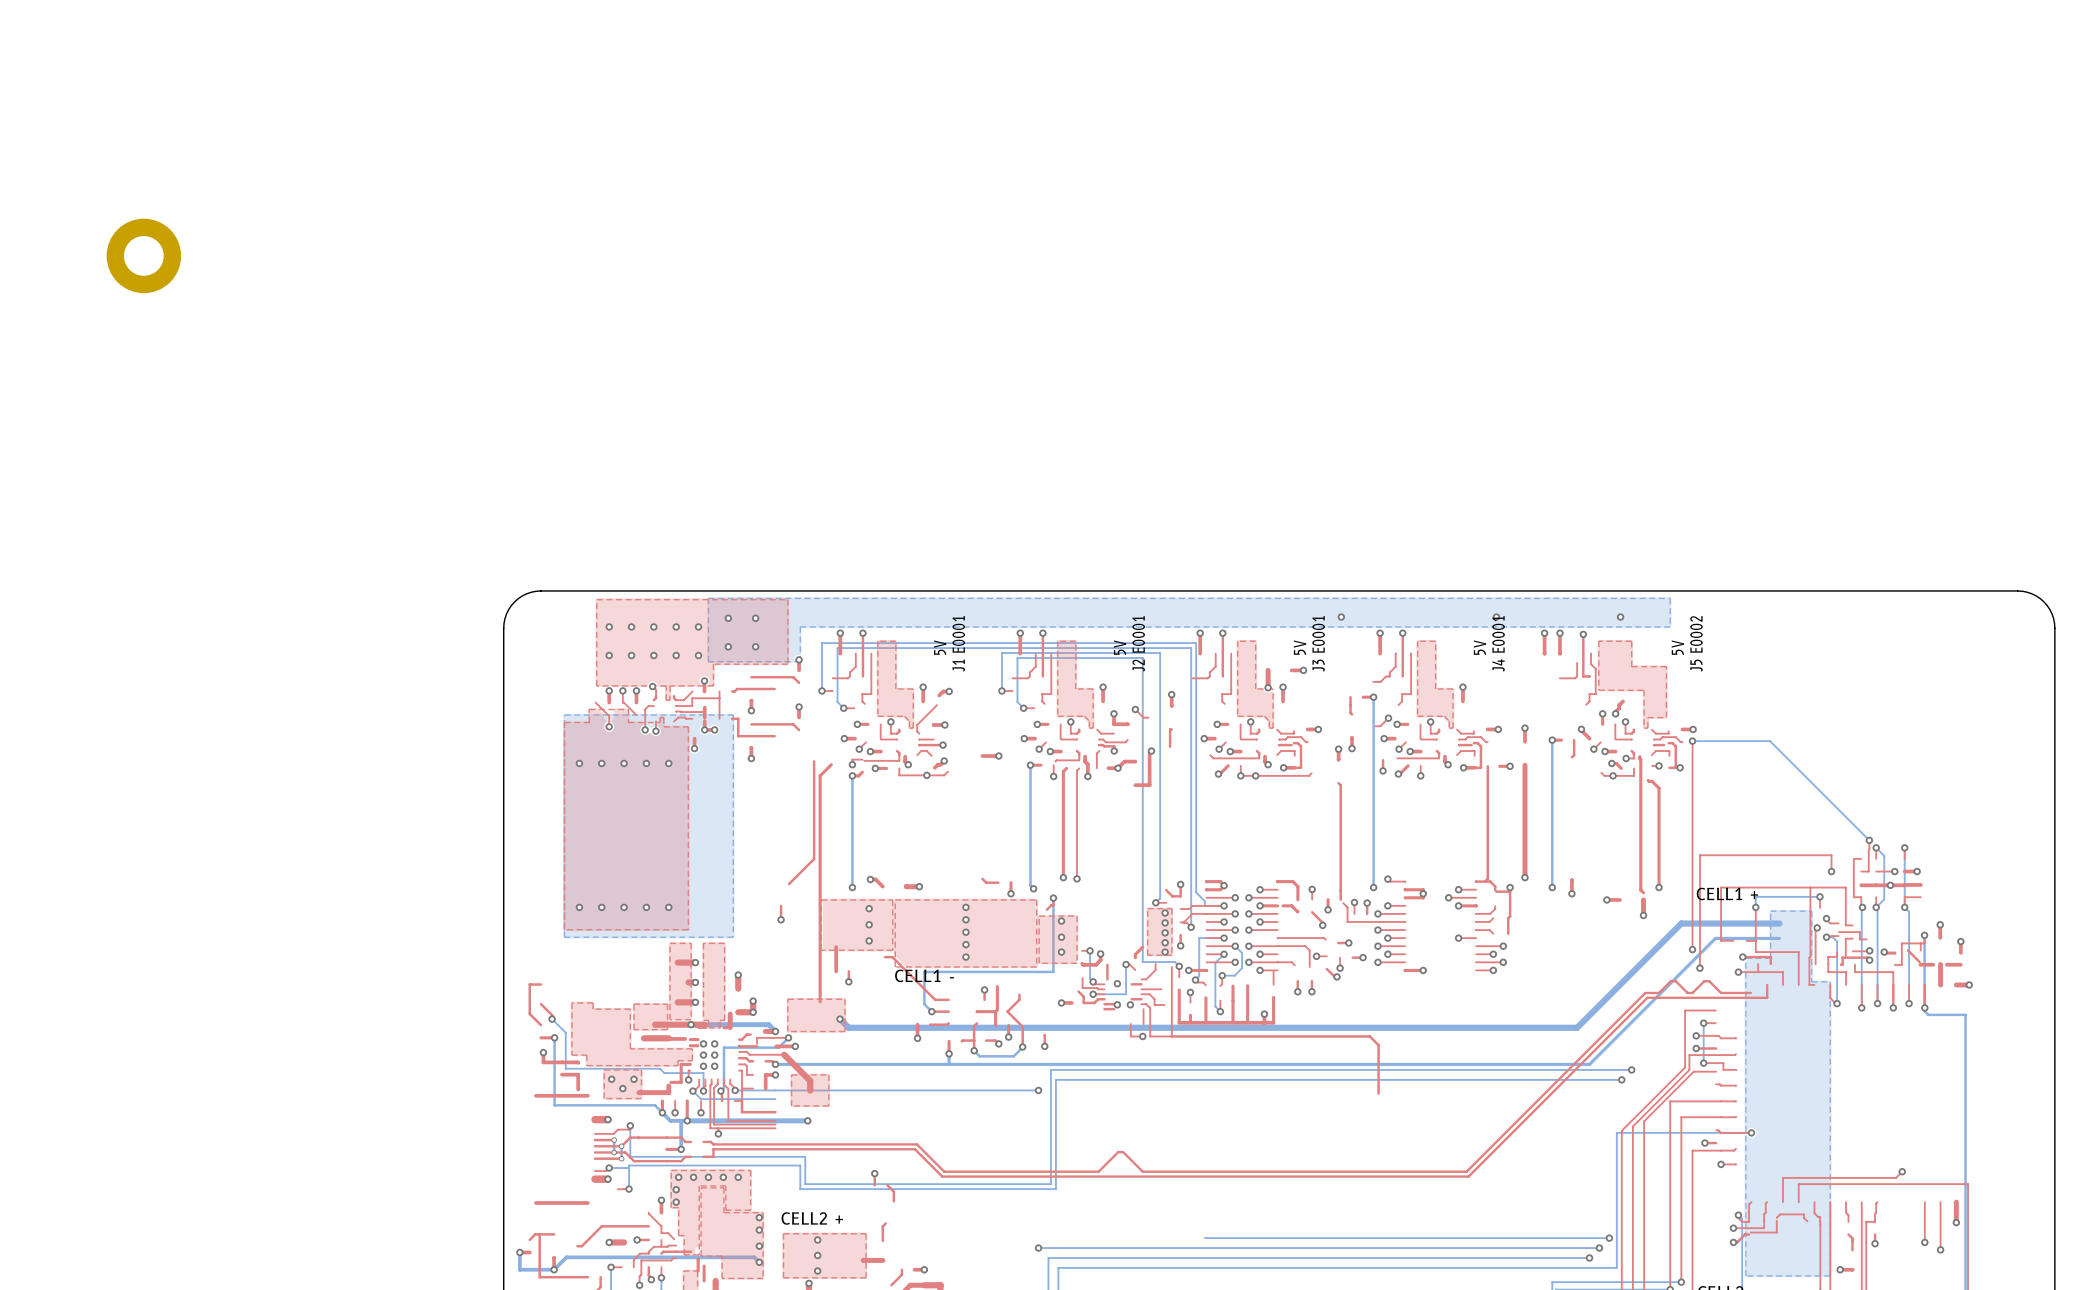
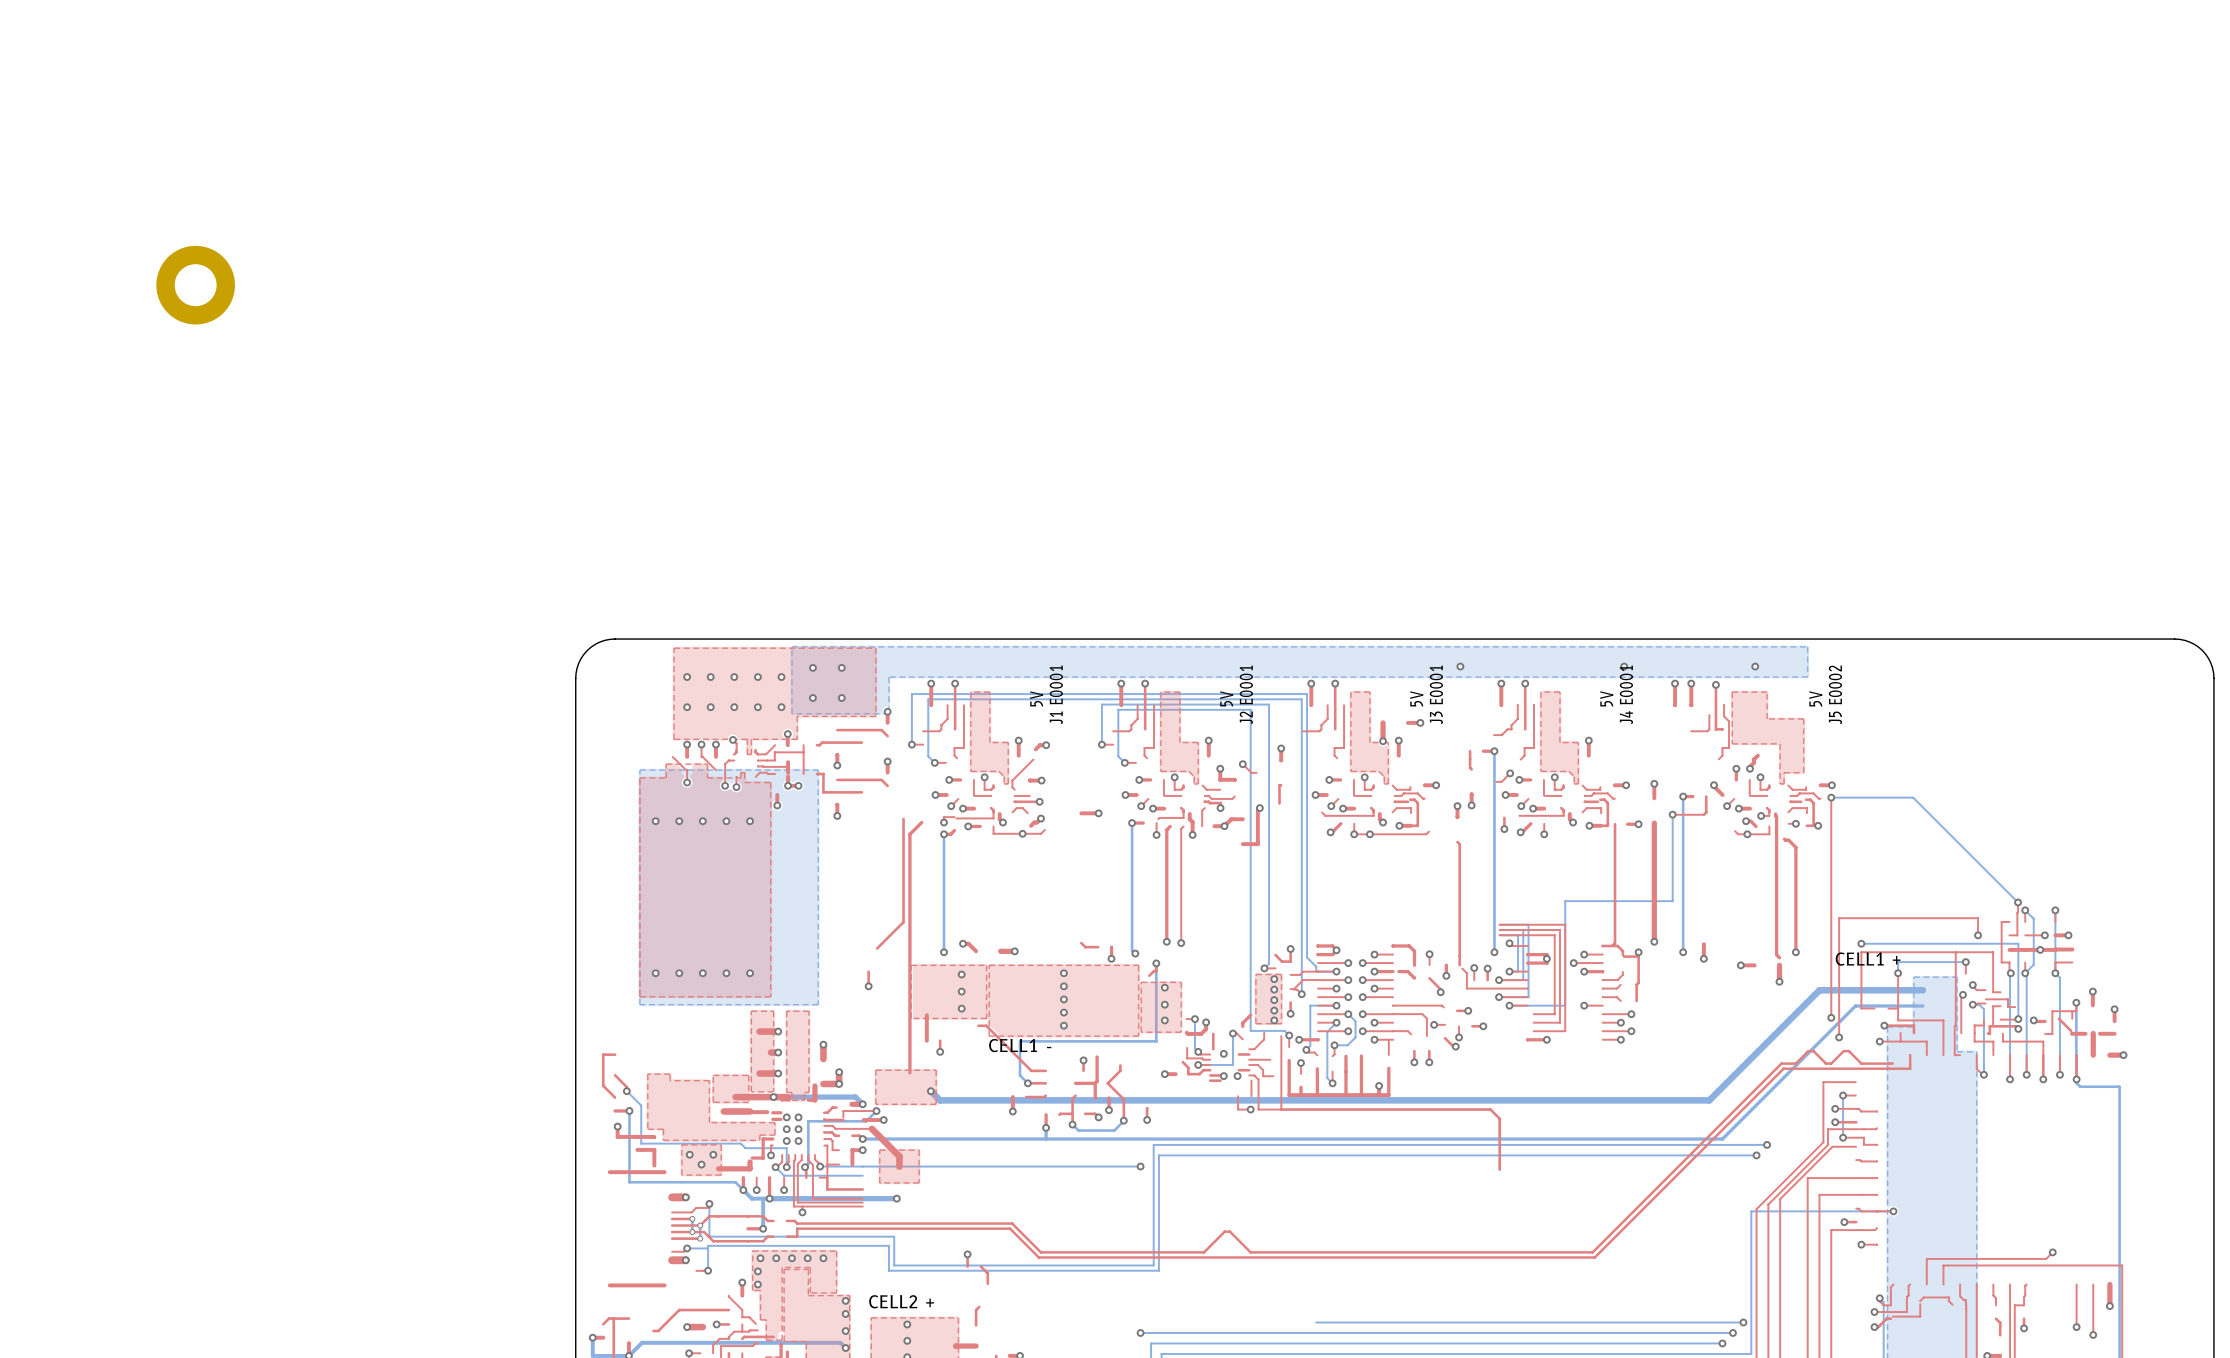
top track: none -> (1672, 814) (1703, 814)
bottom track: none -> (1672, 814) (1672, 901) (1565, 901) (1565, 1005) (1509, 1005)
via: none -> (1672, 814)
top track: none -> (1499, 924) (1565, 924) (1565, 1031) (1533, 1031)
bottom track: none -> (1499, 924) (1528, 924) (1528, 997) (1499, 997)
top track: none -> (1499, 929) (1559, 929) (1559, 1022) (1533, 1022)
bottom track: none -> (1499, 929) (1523, 929) (1523, 980) (1499, 980)
top track: none -> (1499, 935) (1554, 935) (1554, 1014) (1533, 1014)
bottom track: none -> (1499, 935) (1518, 935) (1518, 971) (1509, 971)
bottom track: none -> (1861, 943) (2018, 943) (2018, 1019)
via: none -> (1861, 943)
top track: (1377, 946) (1405, 946) -> none
via: (1377, 946) -> none
top track: (1387, 954) (1405, 954) -> none
via: (1387, 954) -> none
top track: (1377, 962) (1405, 962) -> none
via: (1377, 962) -> none

